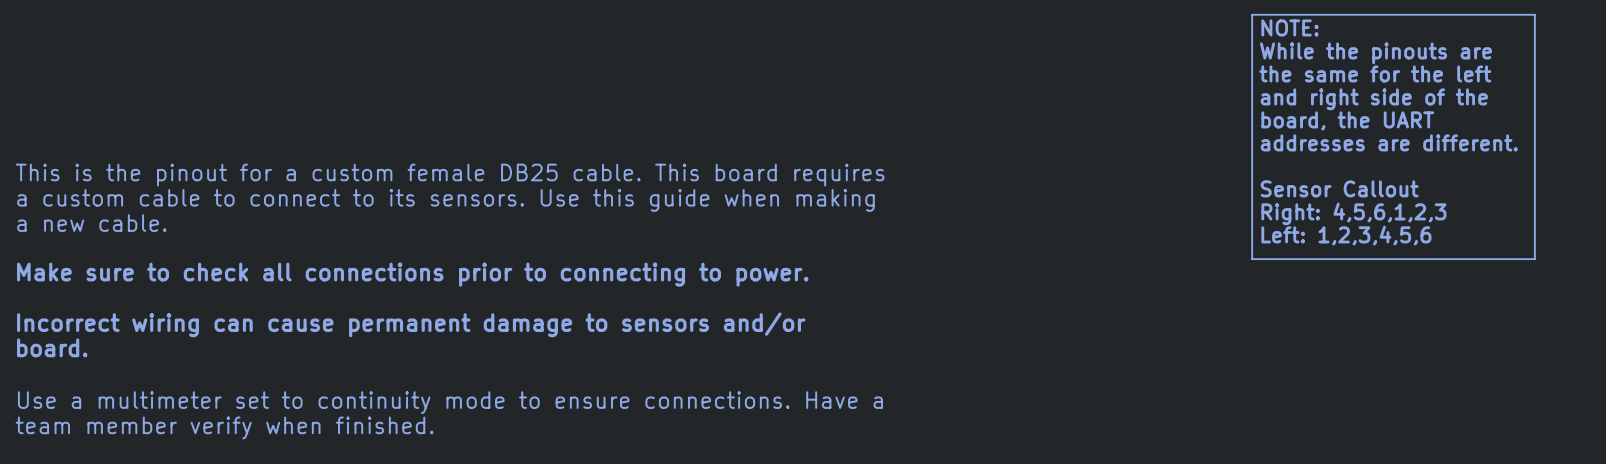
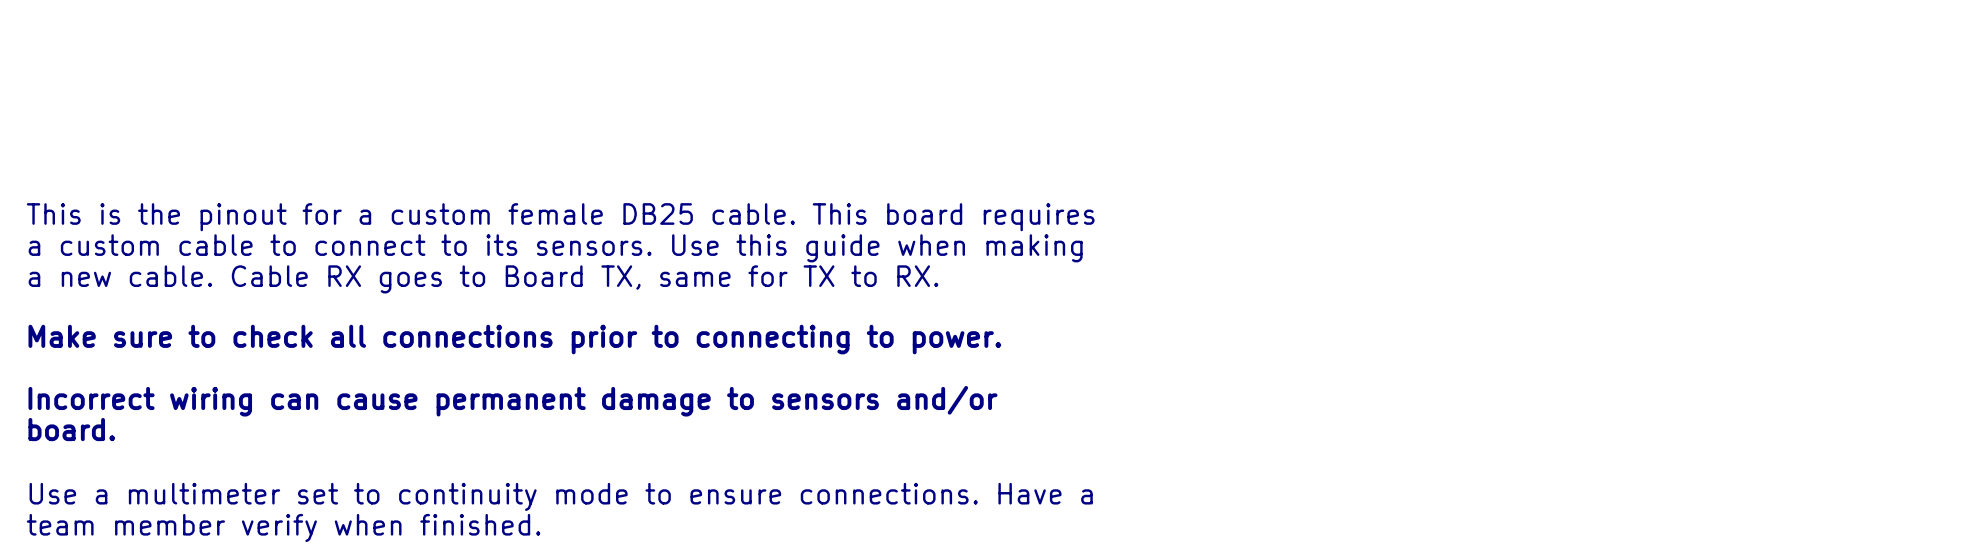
line: (1252, 14) (1534, 14) (1534, 259) (1252, 259) (1252, 14) -> none
text: NOTE: (1290, 27) -> none
text: While the pinouts are (1376, 53) -> none
text: the same for the left (1375, 73) -> none
text: and right side of the (1374, 99) -> none
text: board, the UART (1347, 120) -> none
text: addresses are different. (1389, 142) -> none
text: Sensor Callout (1339, 188) -> none
text: Right: 4,5,6,1,2,3 (1353, 213) -> none
text: a new cable. (91, 223) -> a new cable. Cable RX goes to Board TX, same for TX to RX. (483, 279)
text: Left: 1,2,3,4,5,6 (1346, 235) -> none

